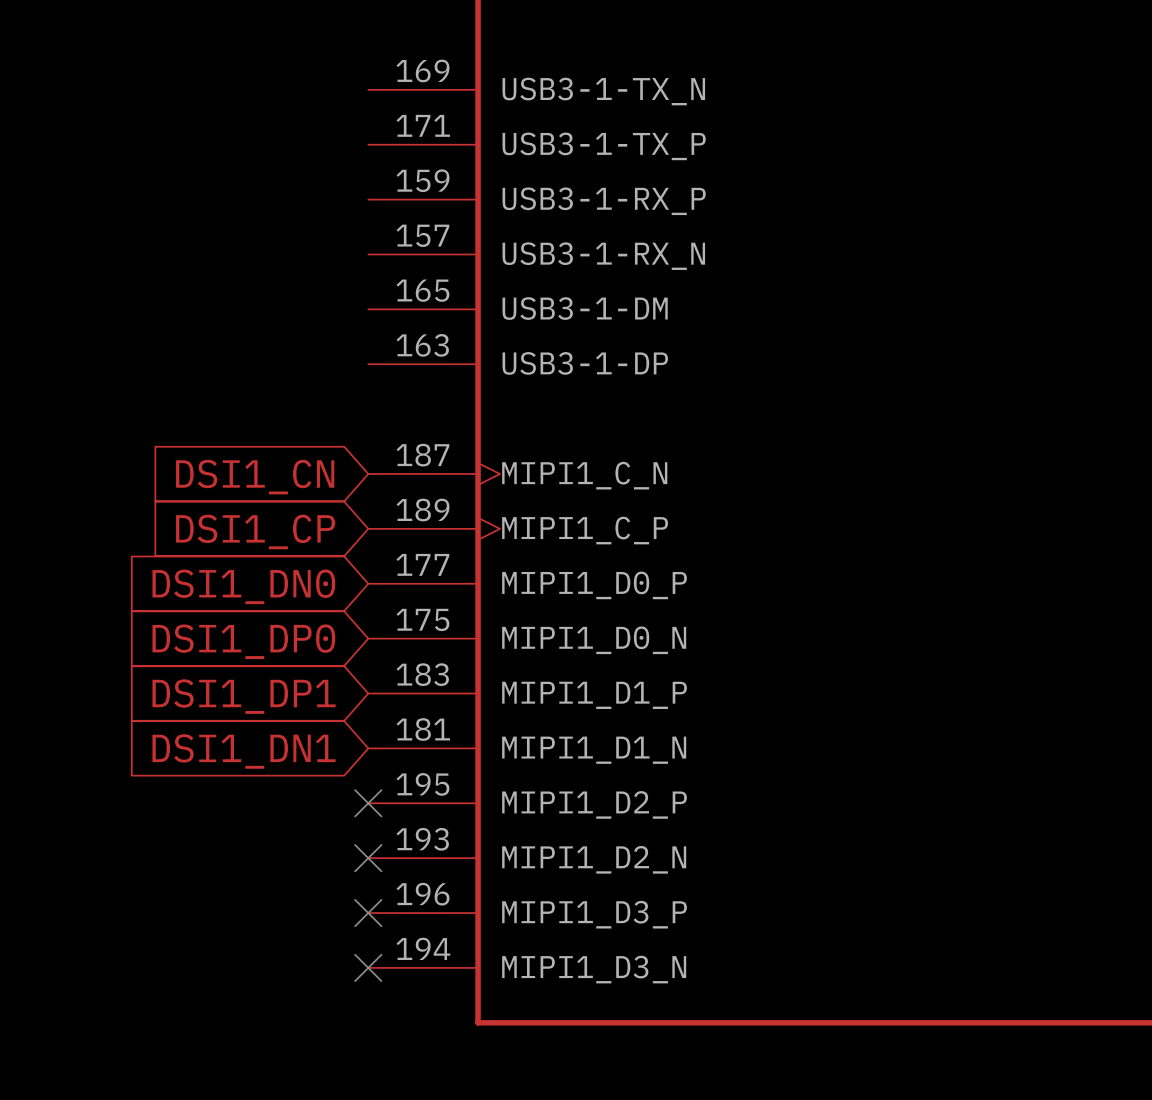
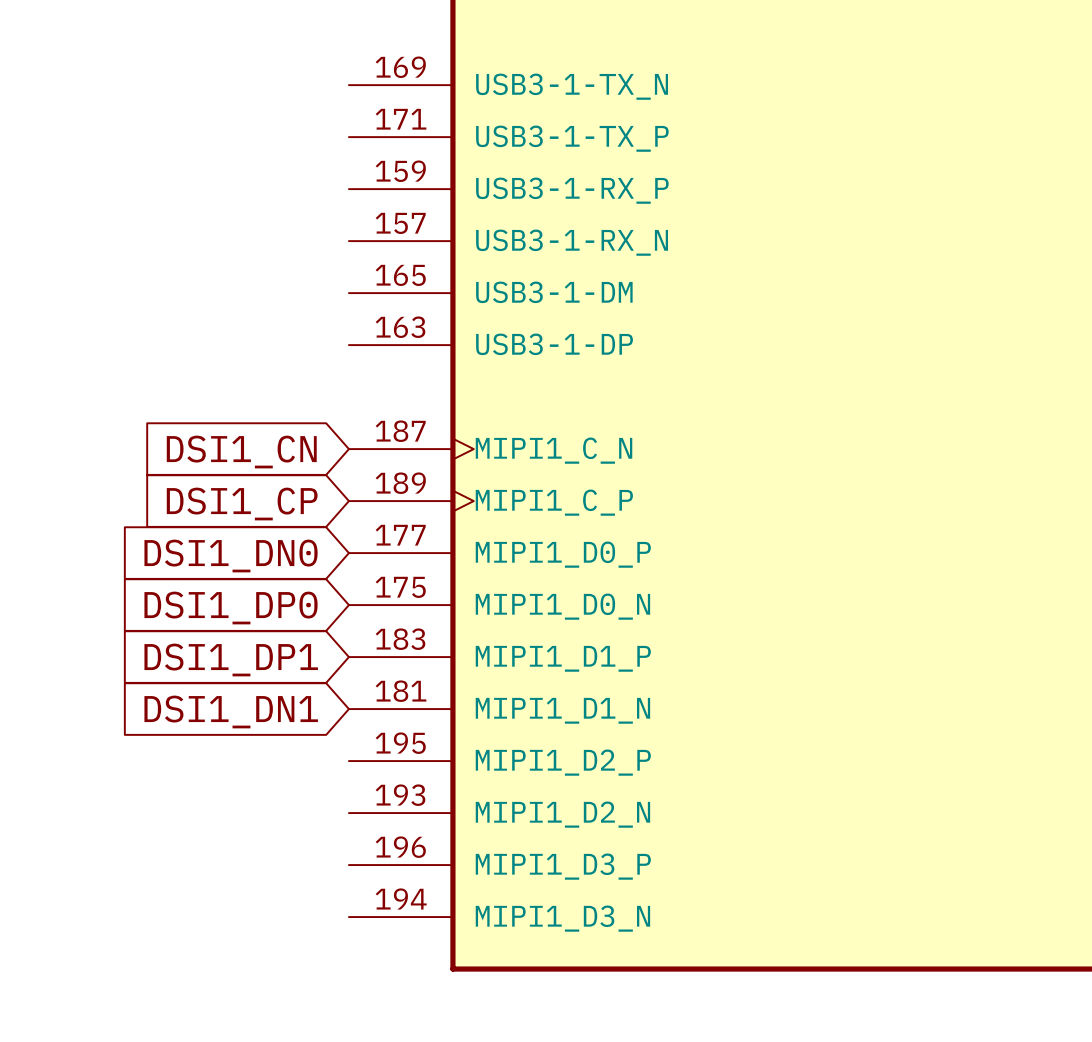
no-connect mark: (368, 803) -> none
no-connect mark: (368, 858) -> none
no-connect mark: (368, 913) -> none
no-connect mark: (368, 967) -> none

